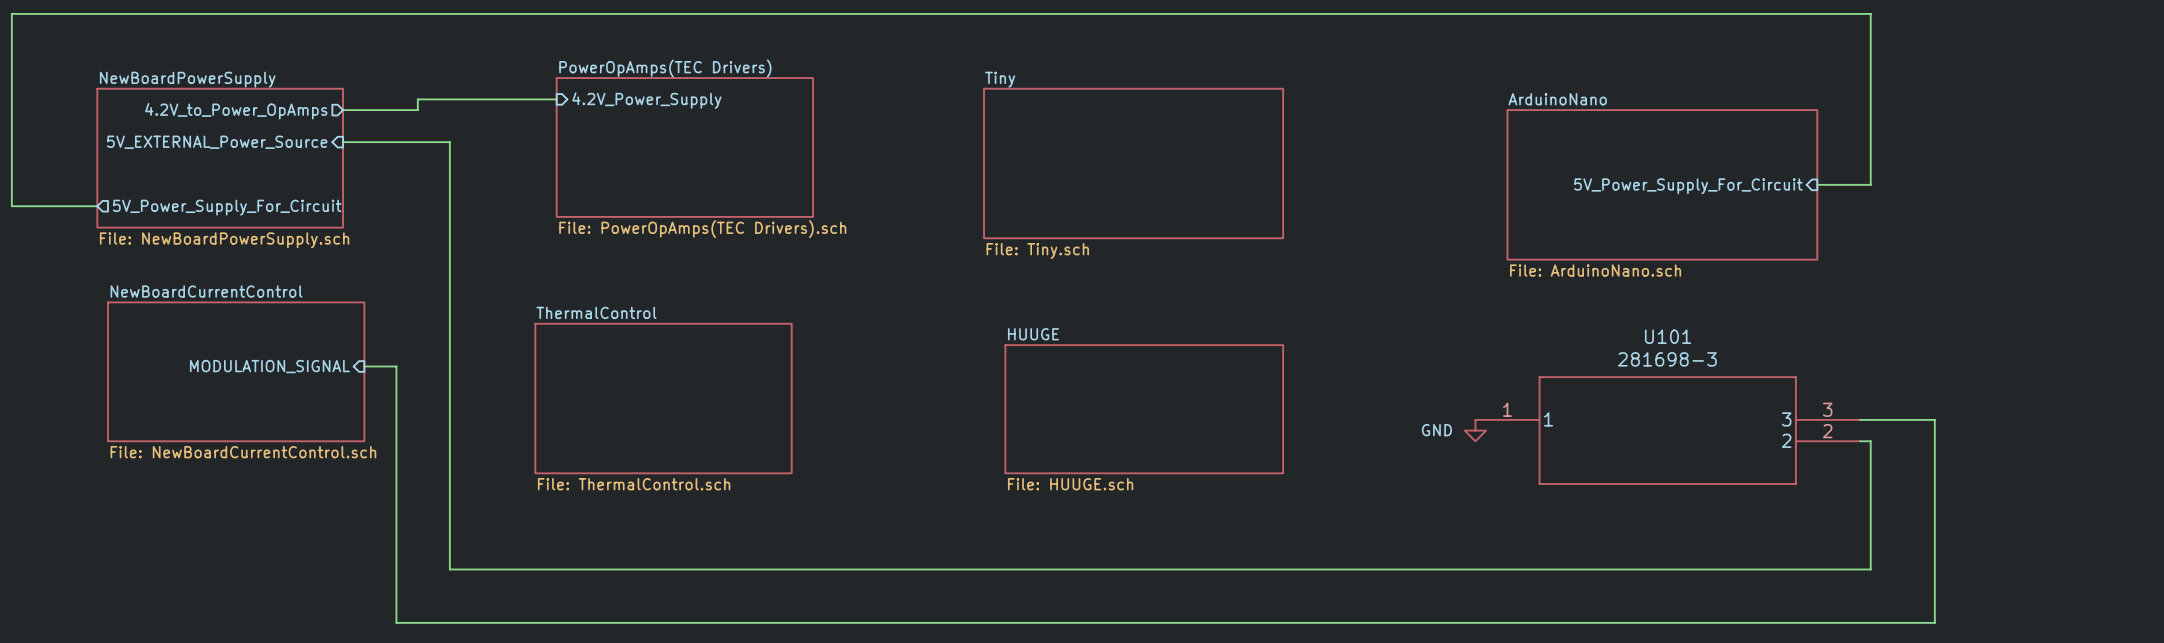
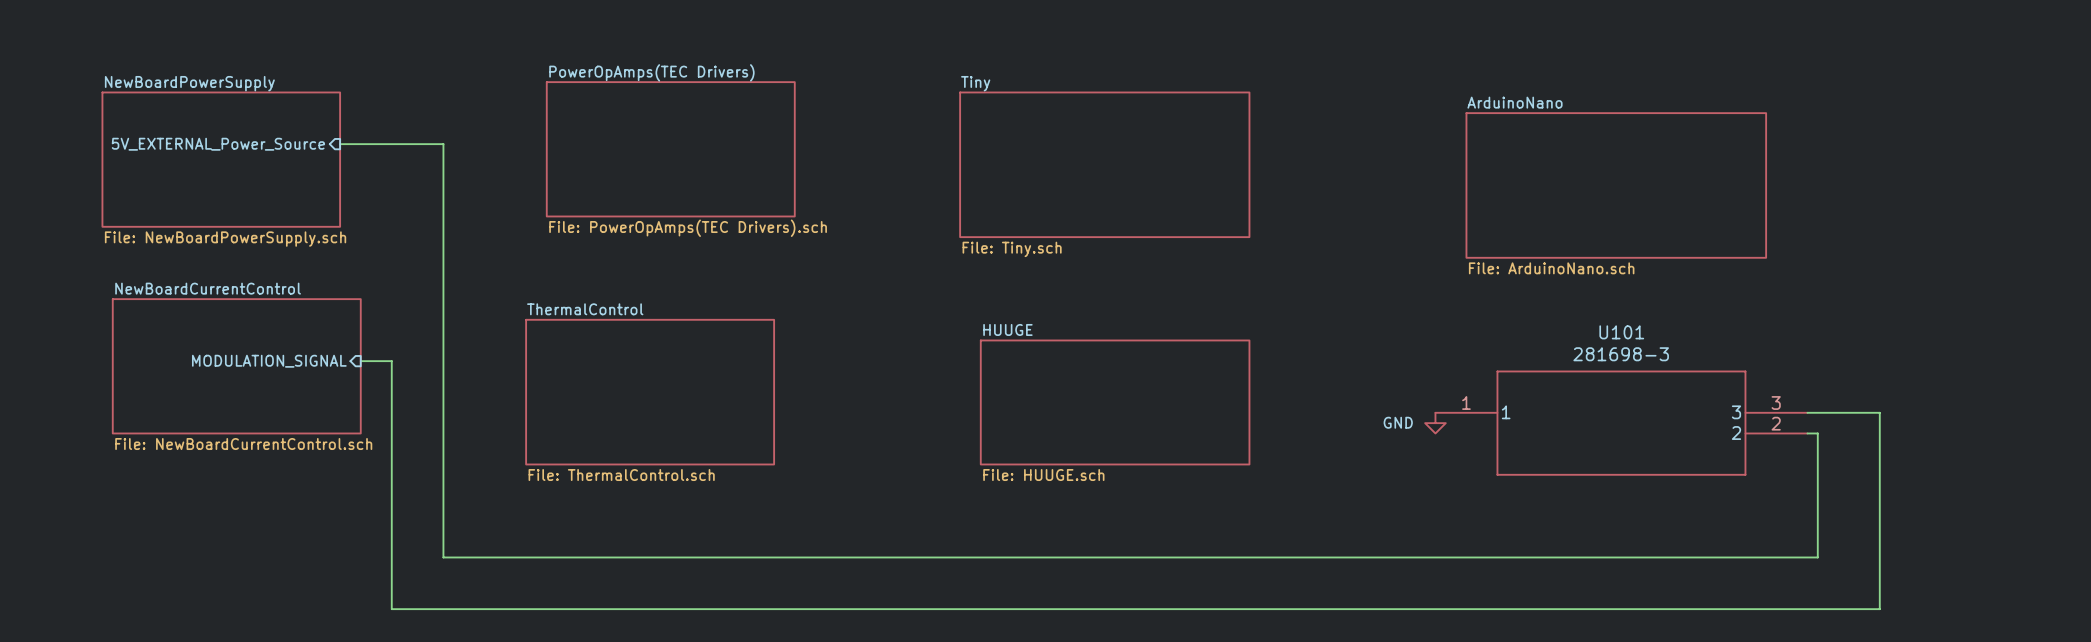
wire: (556, 99) (417, 99) (417, 110) (343, 110) -> none
sheet pin: 4.2V_Power_Supply (646, 100) -> none
sheet pin: 4.2V_to_Power_OpAmps (236, 111) -> none
wire: (1817, 184) (1870, 184) (1870, 13) (11, 13) (11, 206) (97, 206) -> none
sheet pin: 5V_Power_Supply_For_Circuit (1688, 186) -> none
sheet pin: 5V_Power_Supply_For_Circuit (227, 207) -> none

